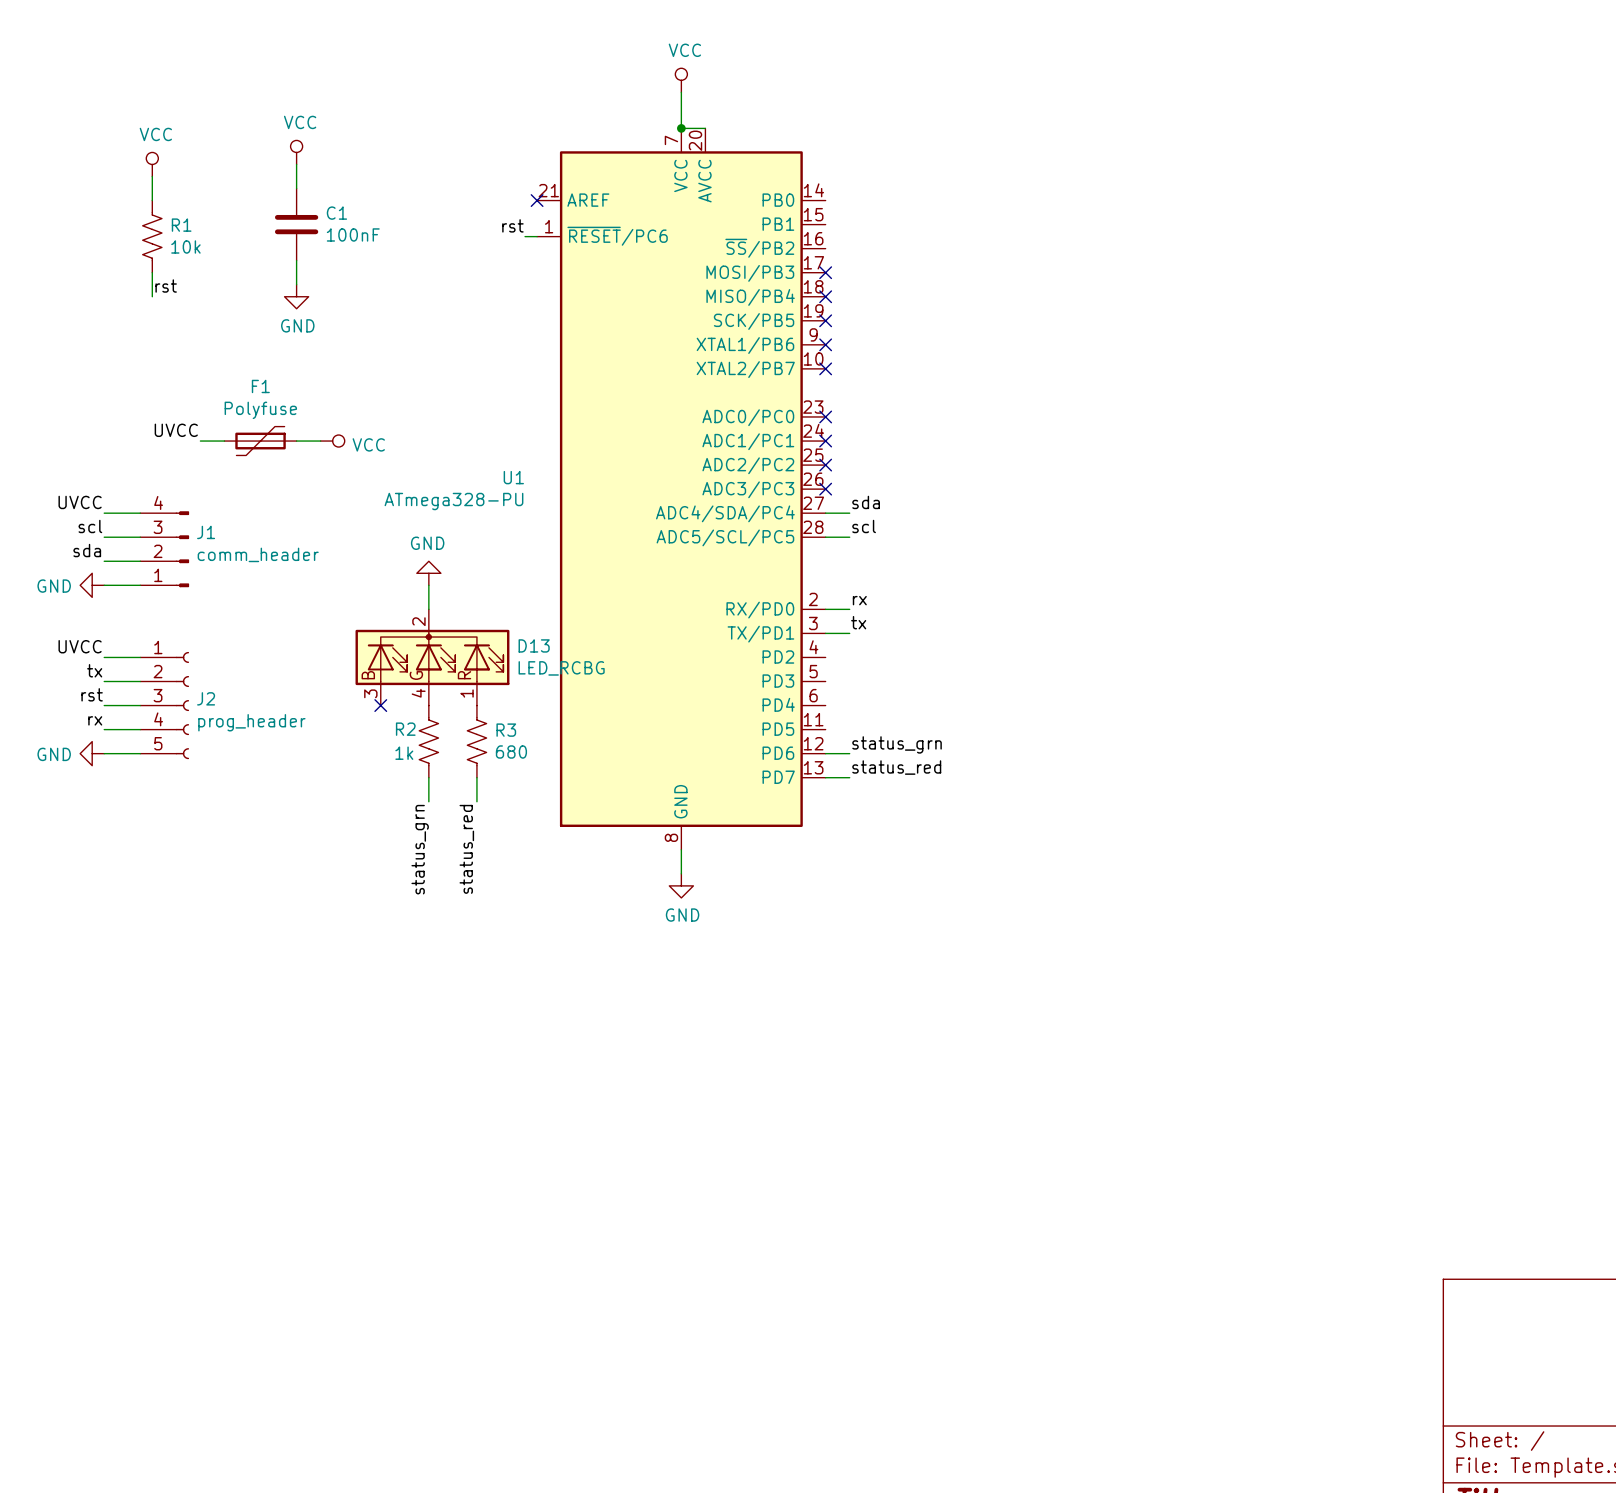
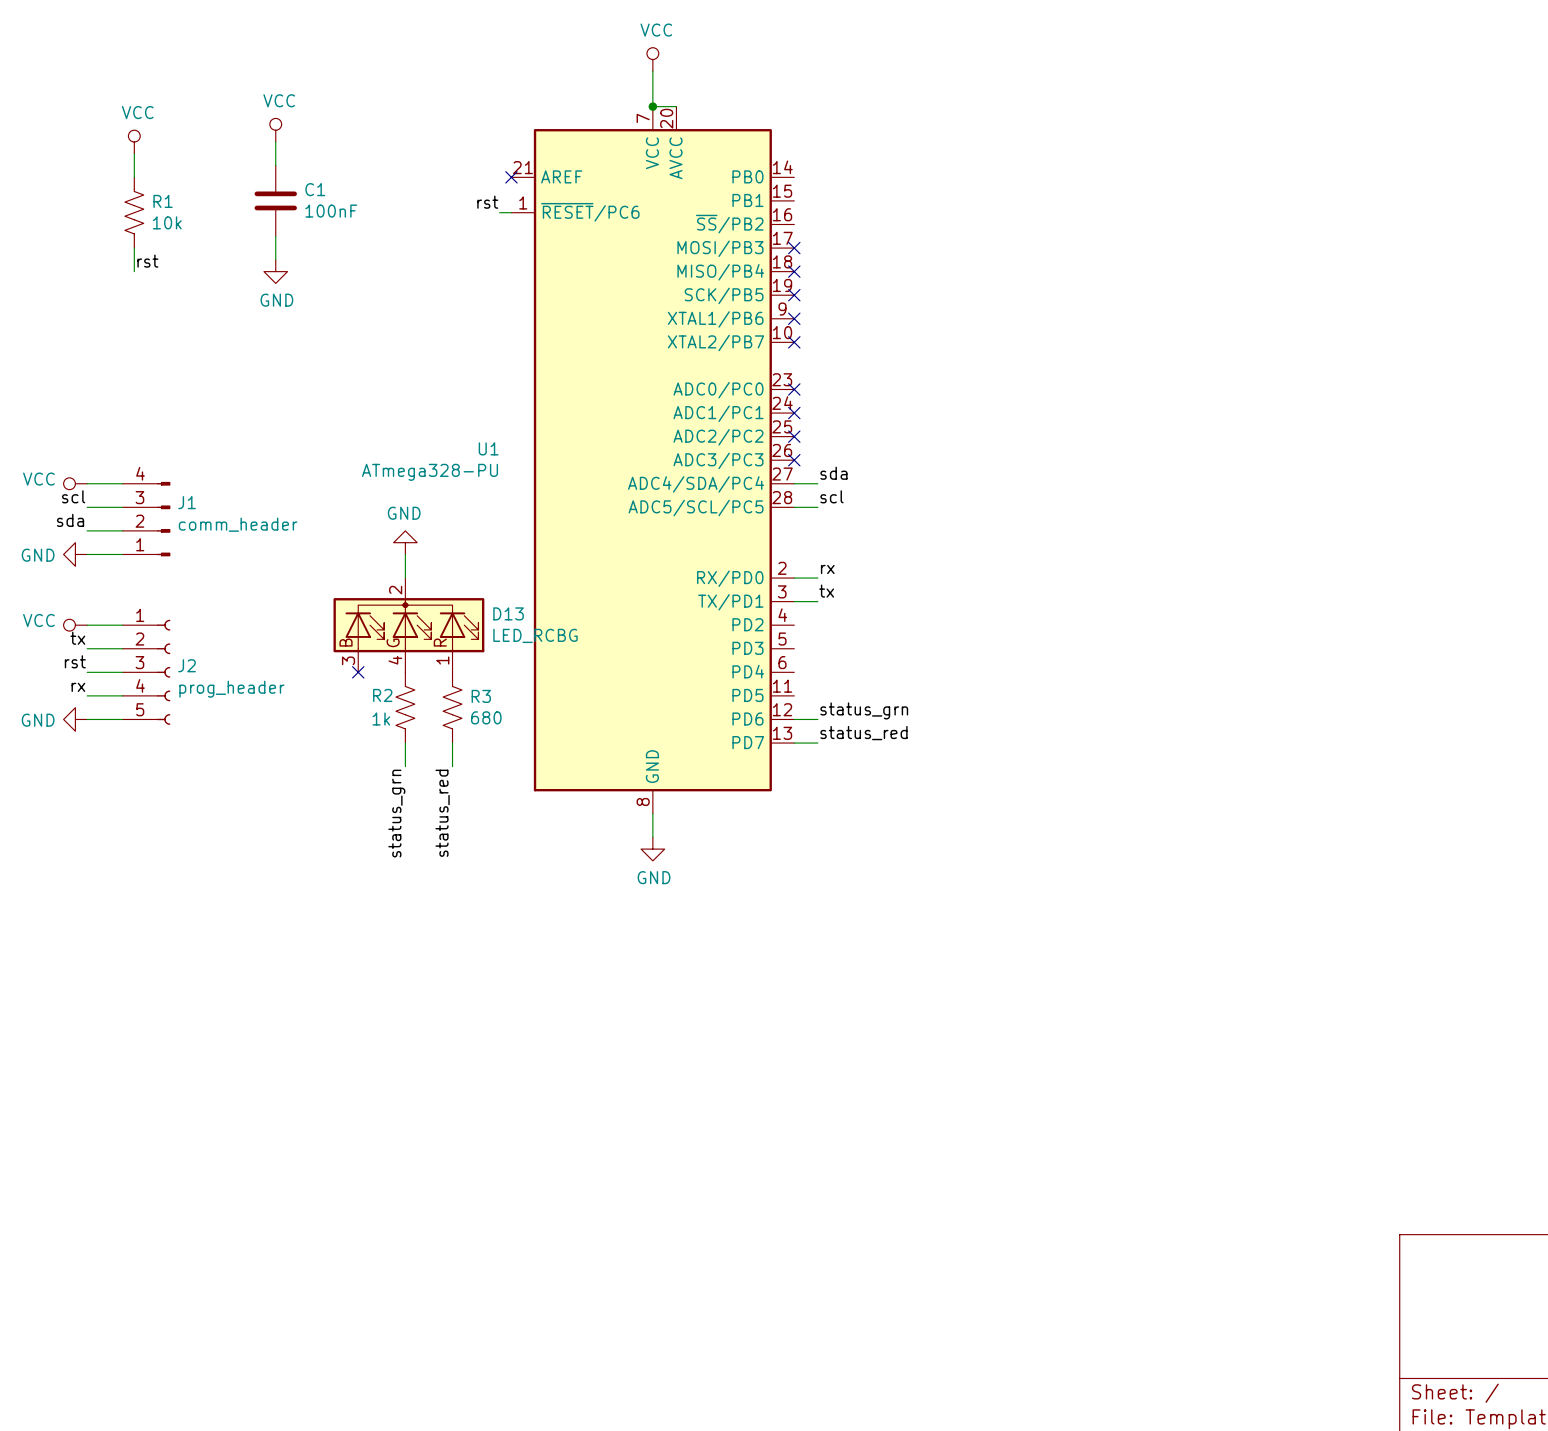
label: UVCC (176, 430) -> none
wire: (200, 441) (224, 441) -> none
F1: Polyfuse (260, 441) -> none
wire: (296, 441) (320, 441) -> none
power symbol: VCC (332, 441) -> none
label: UVCC (80, 502) -> none
power symbol: none -> VCC (75, 483)
label: UVCC (80, 646) -> none
power symbol: none -> VCC (75, 625)

